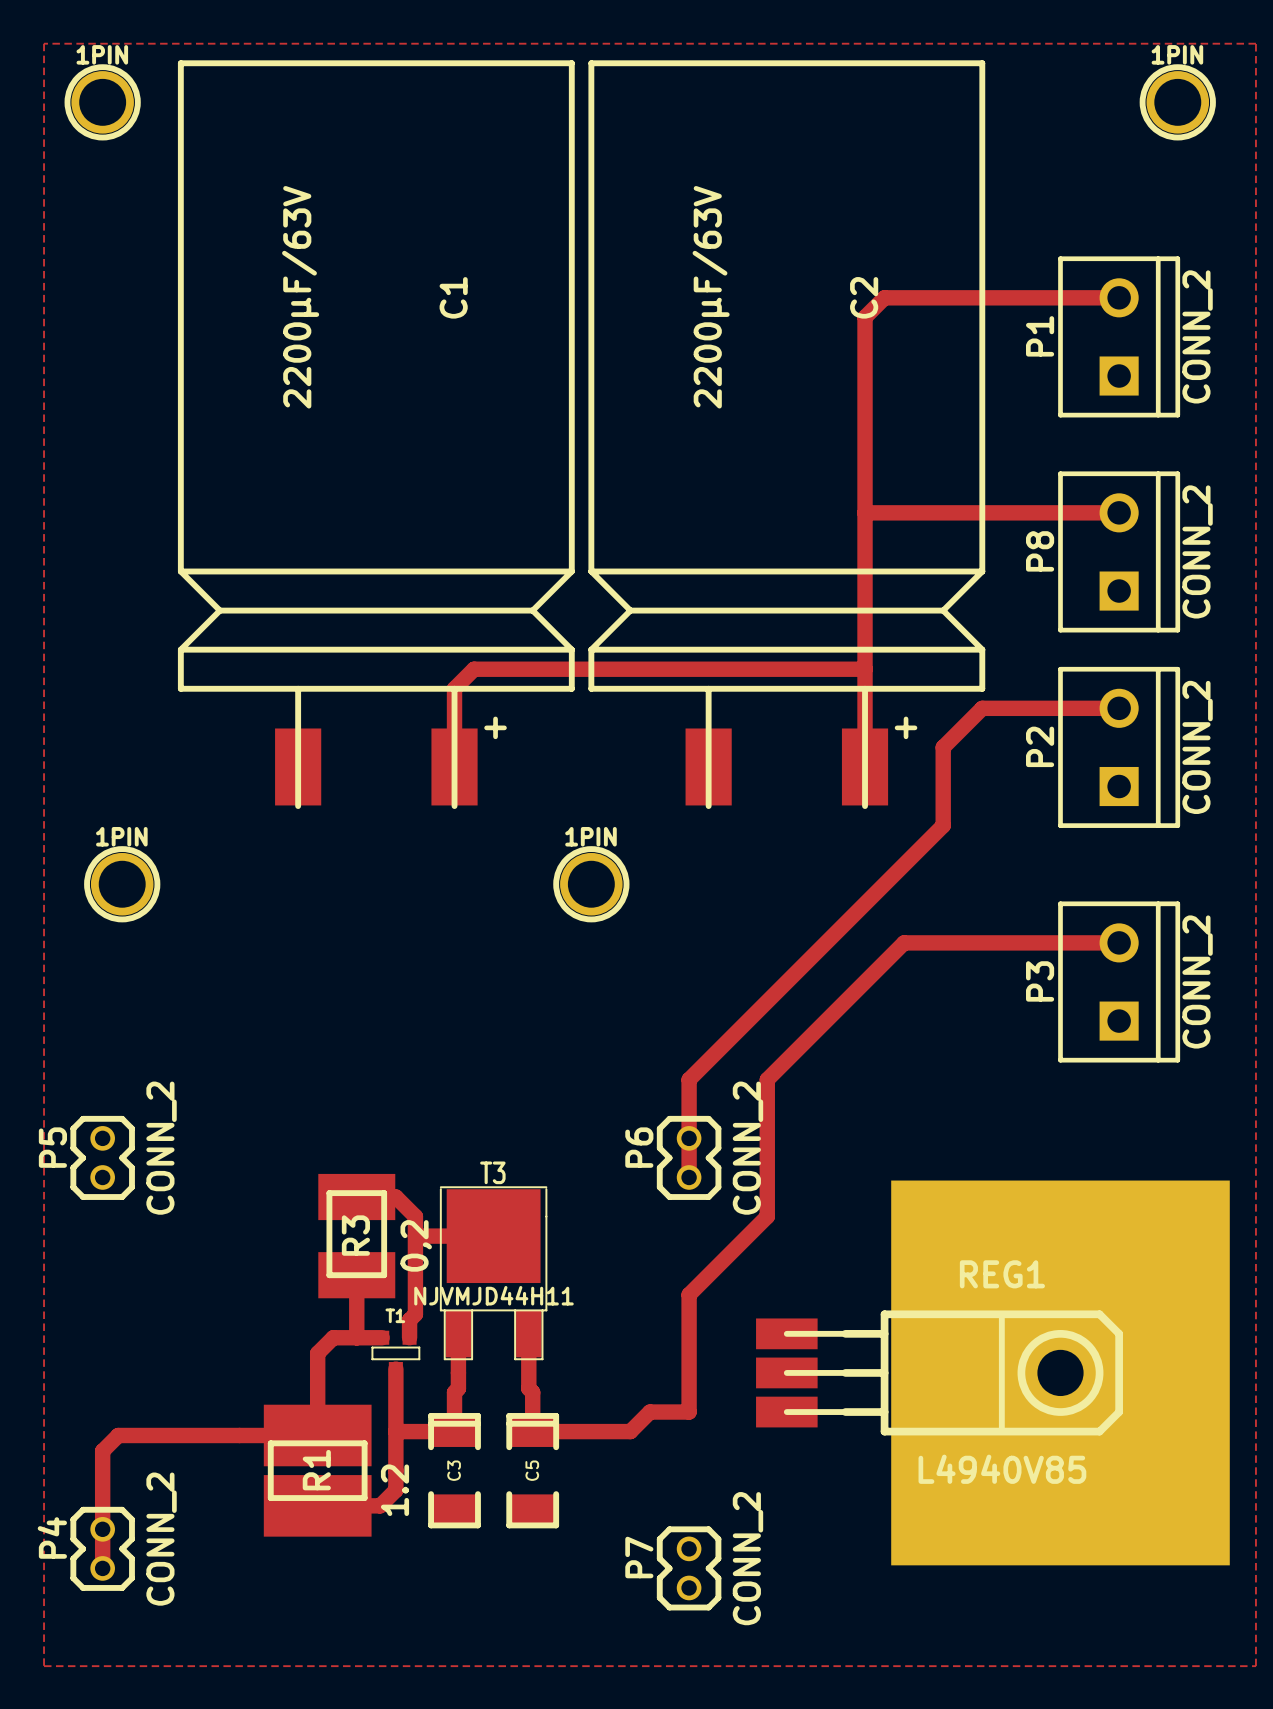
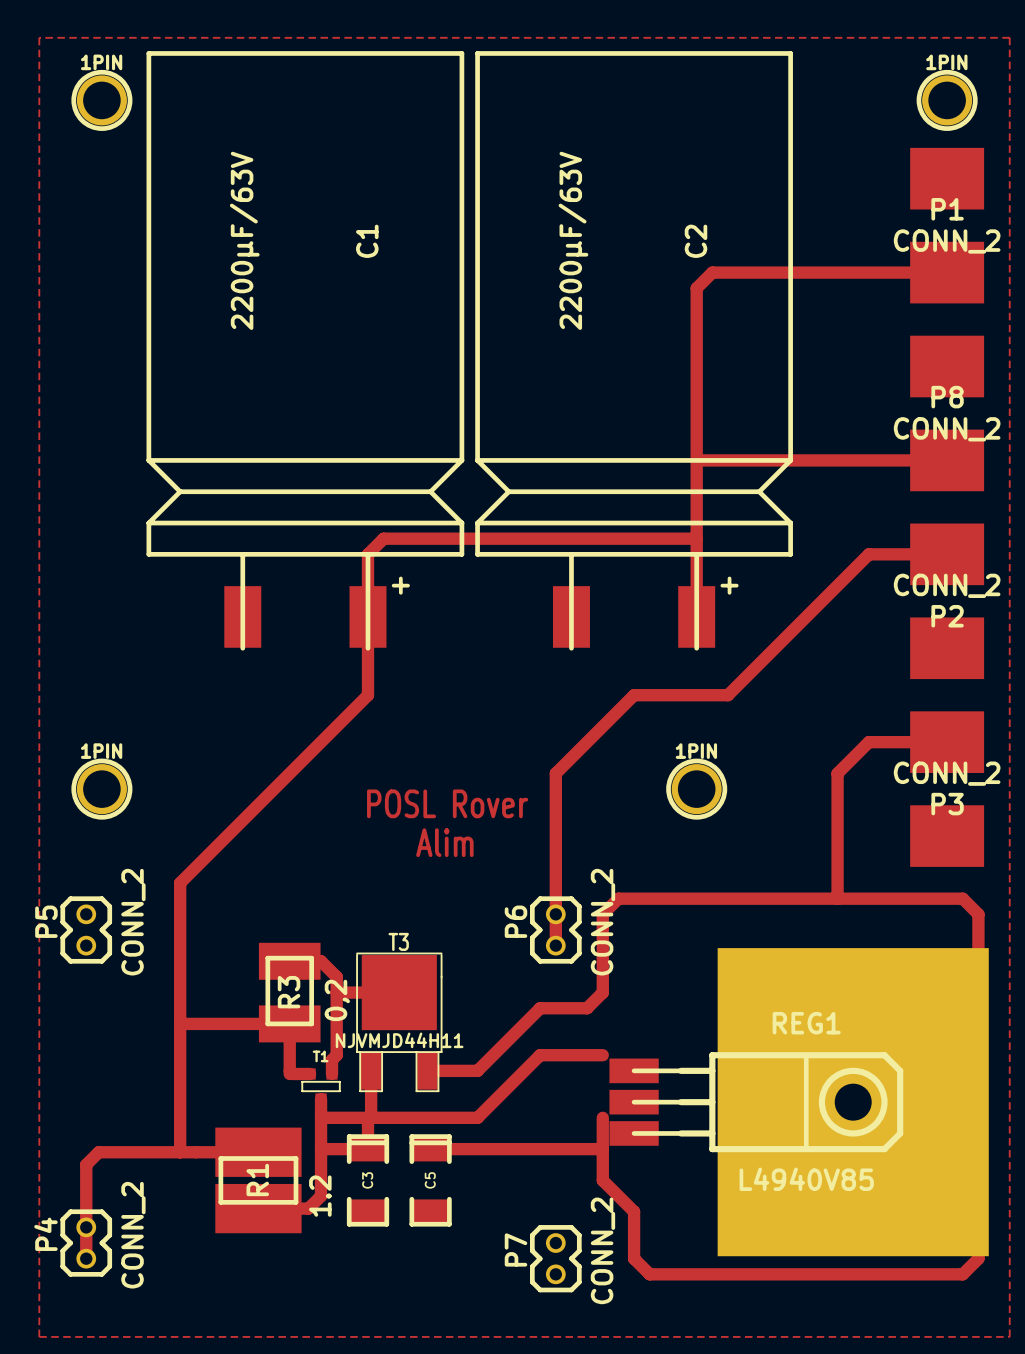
1PIN position: (102, 102) -> (101, 100)
1PIN position: (1177, 102) -> (947, 100)
P1 footprint: [1058, 256, 1181, 418] -> [910, 147, 985, 304]
top track: (1119, 297) (884, 297) (865, 317) (865, 356) -> (947, 272) (712, 272) (696, 288)
P1 name position: P1 (1040, 336) -> P1 (947, 209)
P1 value position: CONN_2 (1197, 336) -> CONN_2 (947, 241)
P8 footprint: [1058, 471, 1181, 633] -> [910, 335, 985, 492]
top track: (865, 512) (1119, 512) -> none
P8 name position: P8 (1040, 551) -> P8 (947, 397)
P8 value position: CONN_2 (1197, 551) -> CONN_2 (947, 429)
top track: none -> (696, 460) (947, 460)
P2 footprint: [1058, 666, 1181, 828] -> [910, 523, 985, 680]
top track: (1119, 708) (982, 708) (943, 747) (943, 825) -> (947, 554) (868, 554) (759, 663)
P2 name position: P2 (1040, 746) -> P2 (947, 616)
P2 value position: CONN_2 (1197, 747) -> CONN_2 (947, 585)
top track: none -> (368, 616) (368, 695) (180, 883) (180, 1152)
top track: (904, 864) (689, 1079) -> (728, 695) (634, 695) (555, 773) (555, 867)
1PIN position: (122, 884) -> (101, 789)
1PIN: (591, 884) -> none
P3 footprint: [1058, 901, 1181, 1063] -> [910, 711, 985, 867]
top track: none -> (947, 742) (868, 742) (837, 773) (837, 898)
top track: (1119, 942) (904, 942) (767, 1079) (767, 1216) (747, 1236) -> (602, 1117) (602, 1180) (634, 1211) (634, 1258) (649, 1274) (962, 1274) (978, 1258) (978, 914) (962, 898) (618, 898) (602, 914) (602, 992)
1PIN: none -> (696, 789)
P3 name position: P3 (1040, 981) -> P3 (947, 804)
P3 value position: CONN_2 (1197, 981) -> CONN_2 (947, 773)
text: none -> POSL Rover (447, 803)
text: none -> Alim (444, 842)
top track: (728, 1255) (689, 1294) (689, 1412) (649, 1412) (630, 1431) -> (587, 1008) (540, 1008) (477, 1070) (427, 1070)
top track: none -> (180, 1023) (289, 1023)
top track: none -> (602, 1055) (540, 1055) (477, 1117) (321, 1117)
top track: (528, 1333) (528, 1388) (532, 1392) (532, 1431) -> none
top track: (360, 1337) (333, 1337) (317, 1353) (317, 1435) -> none
top track: none -> (508, 1149) (602, 1149)

